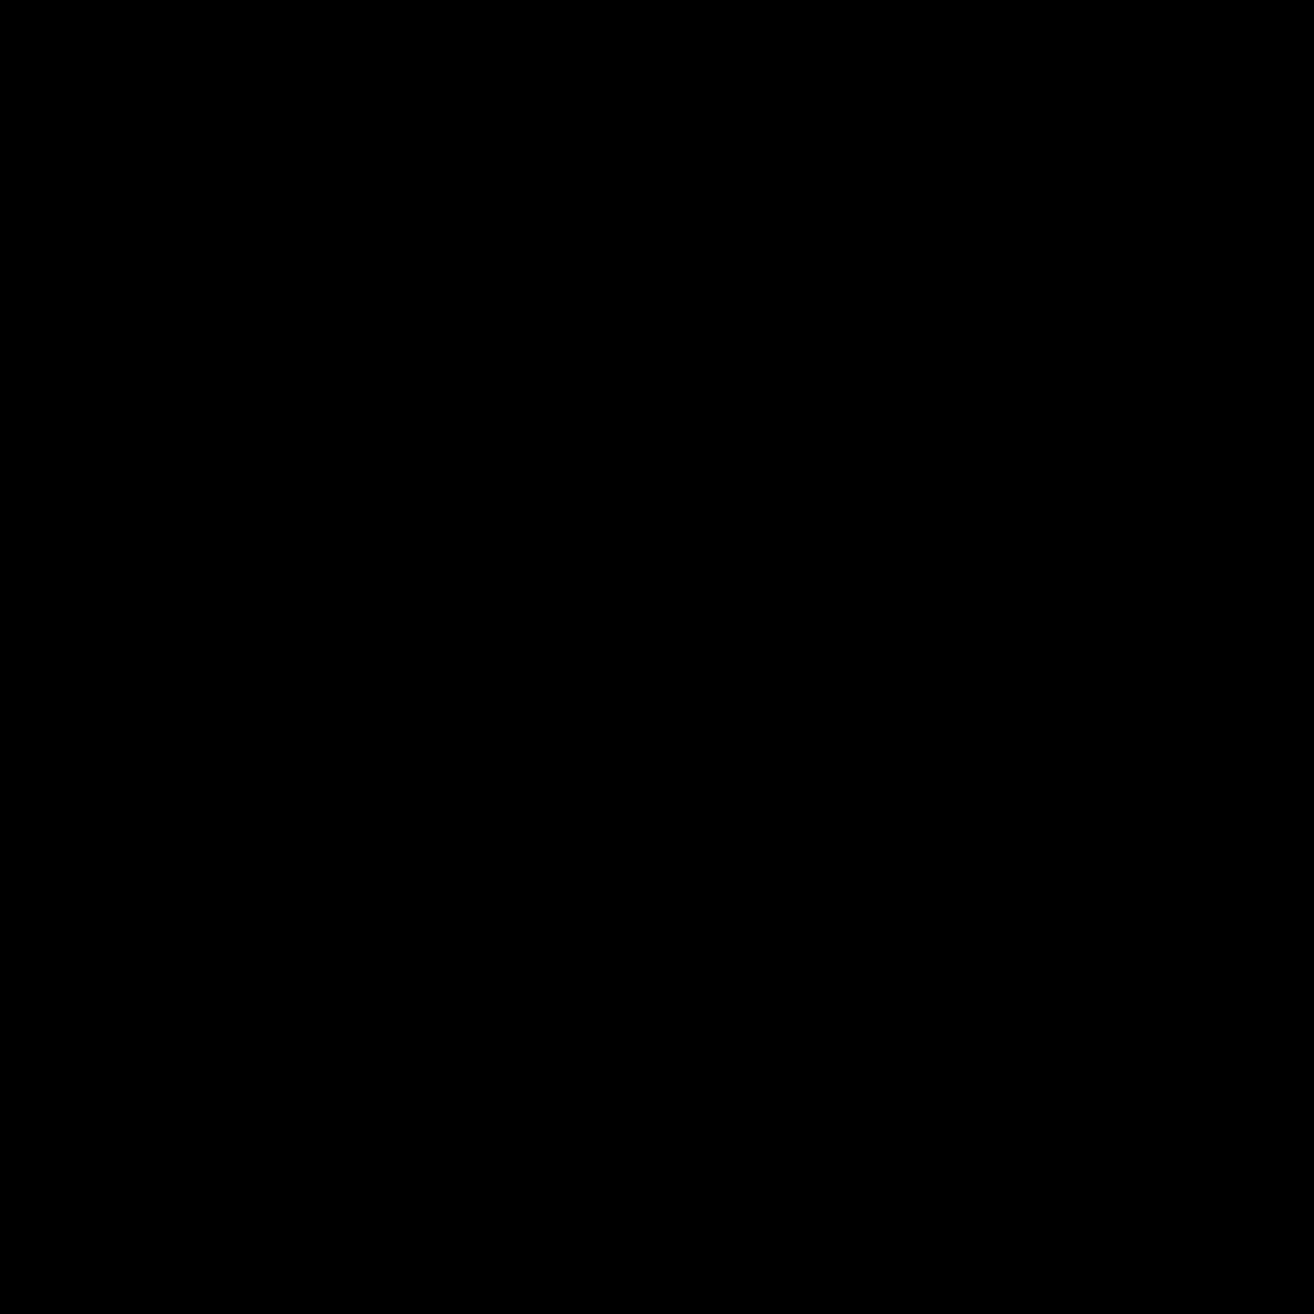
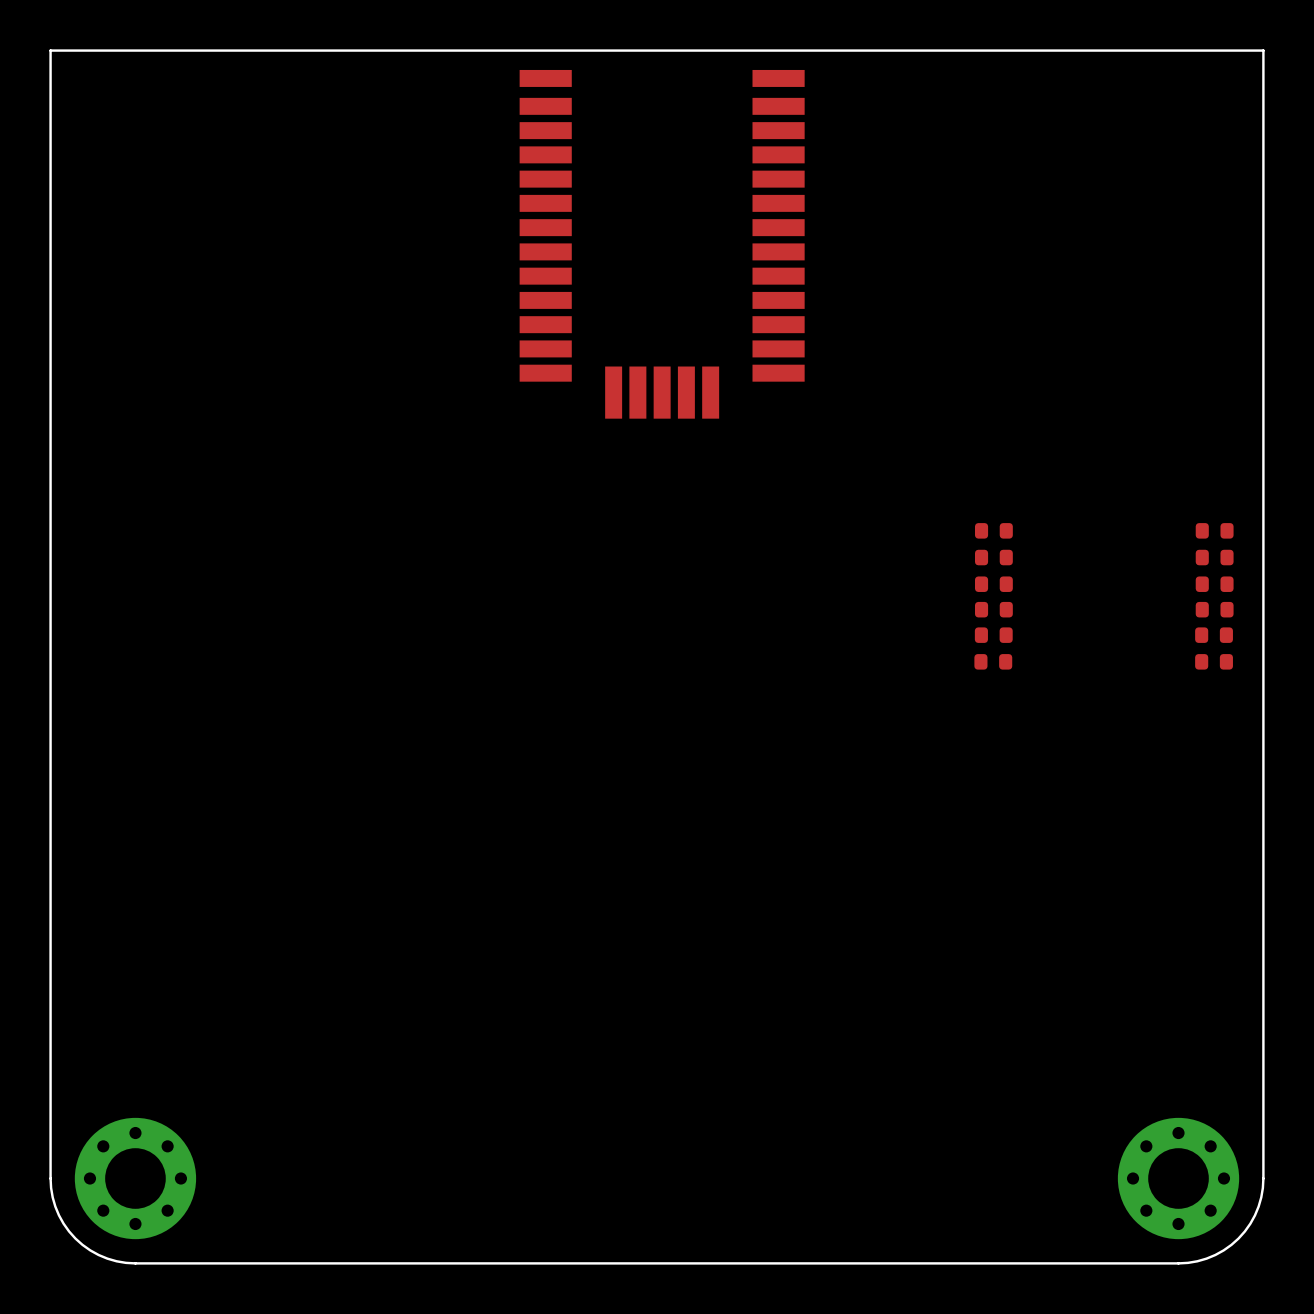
board edge: none -> (1263, 50) (50, 50) (50, 1178) (55, 1206) (63, 1223) (75, 1238) (98, 1255) (116, 1261) (135, 1263) (1178, 1263) (1206, 1258) (1223, 1250) (1238, 1238) (1250, 1223) (1258, 1206) (1263, 1178) (1263, 50)
part: none -> (662, 244)
part: none -> (993, 530)
part: none -> (1214, 530)
part: none -> (993, 557)
part: none -> (1214, 557)
part: none -> (993, 584)
part: none -> (1214, 584)
part: none -> (993, 609)
part: none -> (1214, 609)
part: none -> (993, 635)
part: none -> (1214, 635)
part: none -> (993, 661)
part: none -> (1214, 661)
part: none -> (135, 1178)
part: none -> (1178, 1178)

